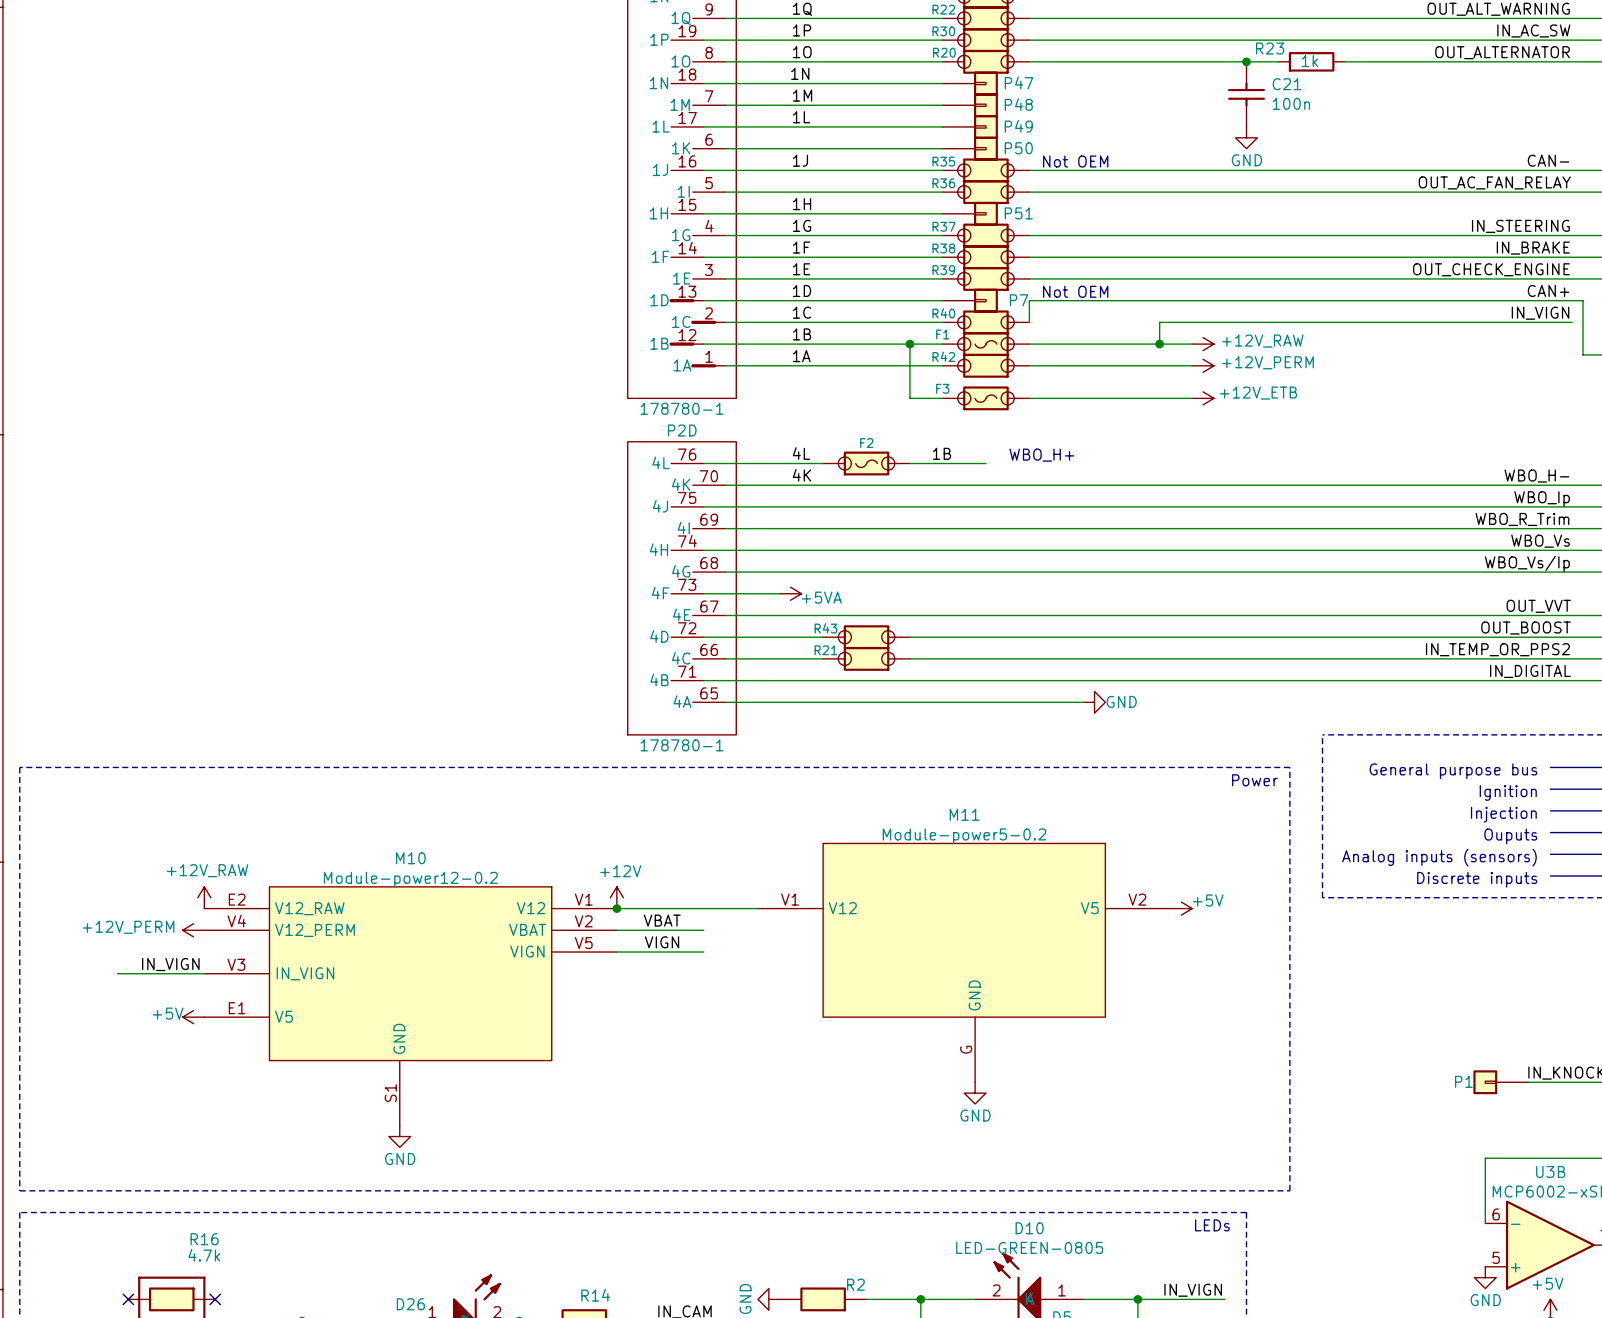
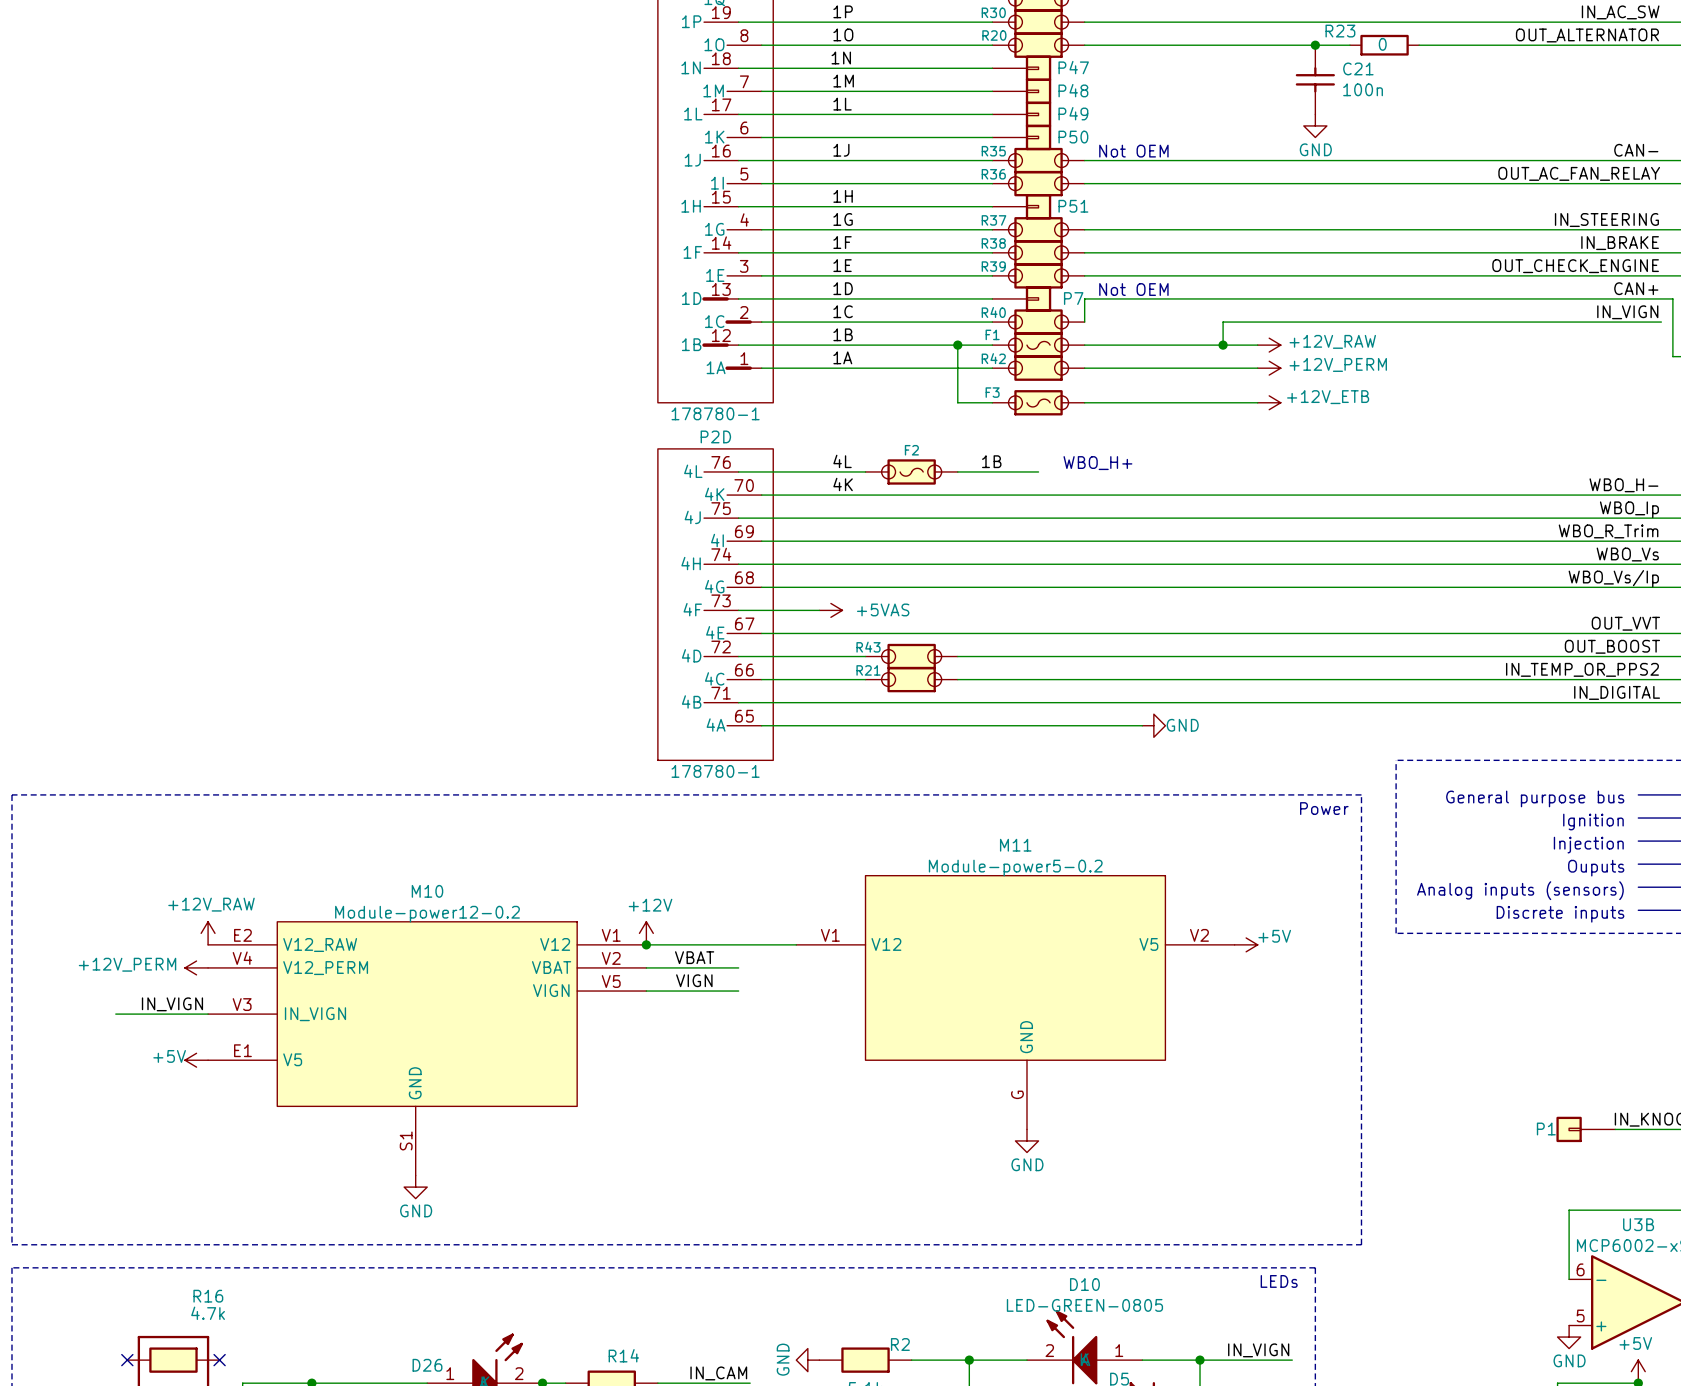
R23 value: 1k (1309, 61) -> 0 (1382, 44)
power symbol: +5VA (790, 593) -> +5VAS (830, 610)

